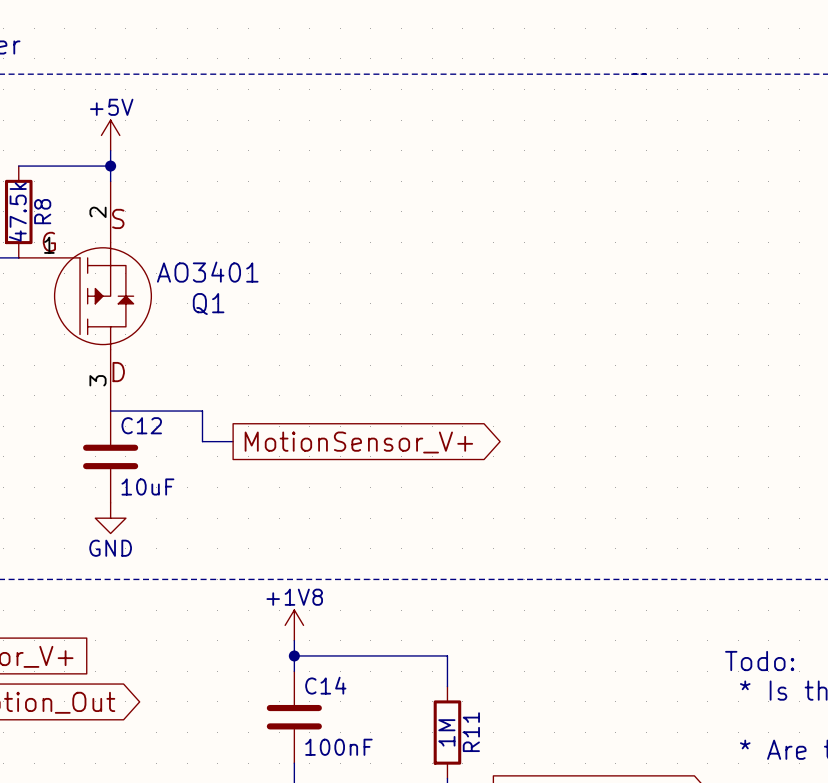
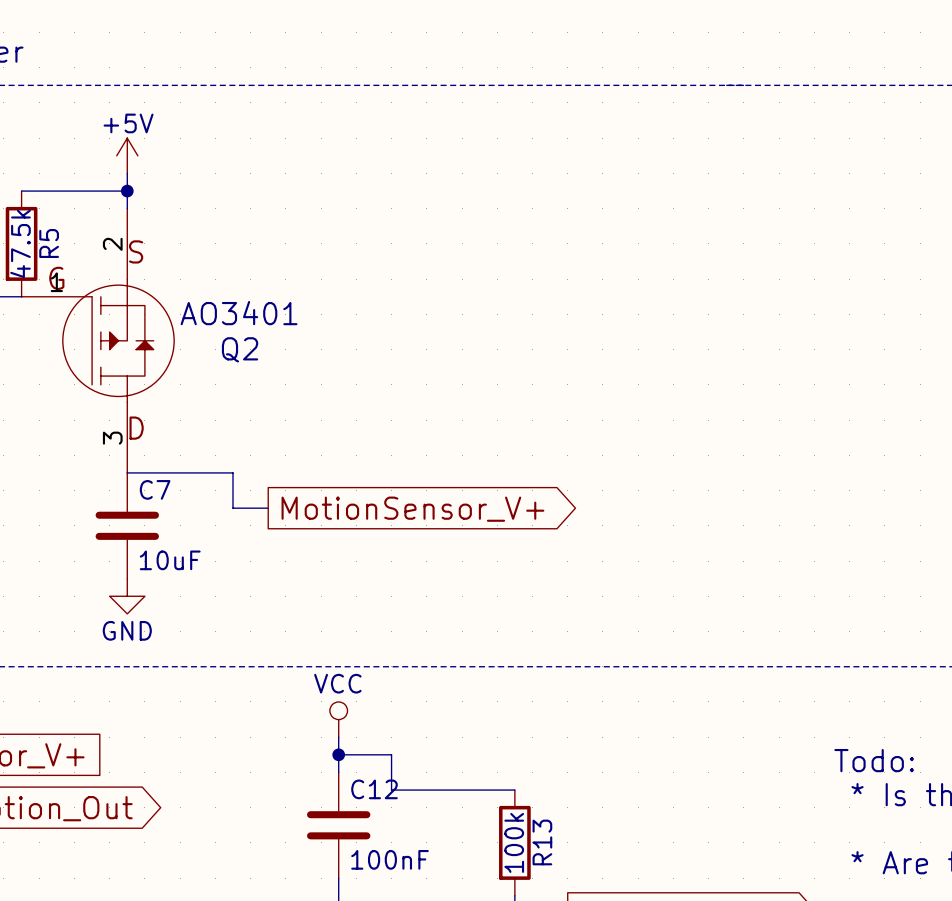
R8 name: R8 (42, 211) -> R5 (49, 243)
Q1 name: Q1 (208, 304) -> Q2 (240, 349)
C12 name: C12 (141, 425) -> C7 (155, 489)
power symbol: +1V8 (294, 625) -> VCC (338, 719)
wire: (340, 655) (447, 655) (447, 686) -> (391, 754) (391, 790) (514, 790)
C14 name: C14 (325, 685) -> C12 (374, 789)
R11 value: 1M (446, 732) -> 100k (514, 842)
R11 name: R11 (471, 732) -> R13 (542, 842)

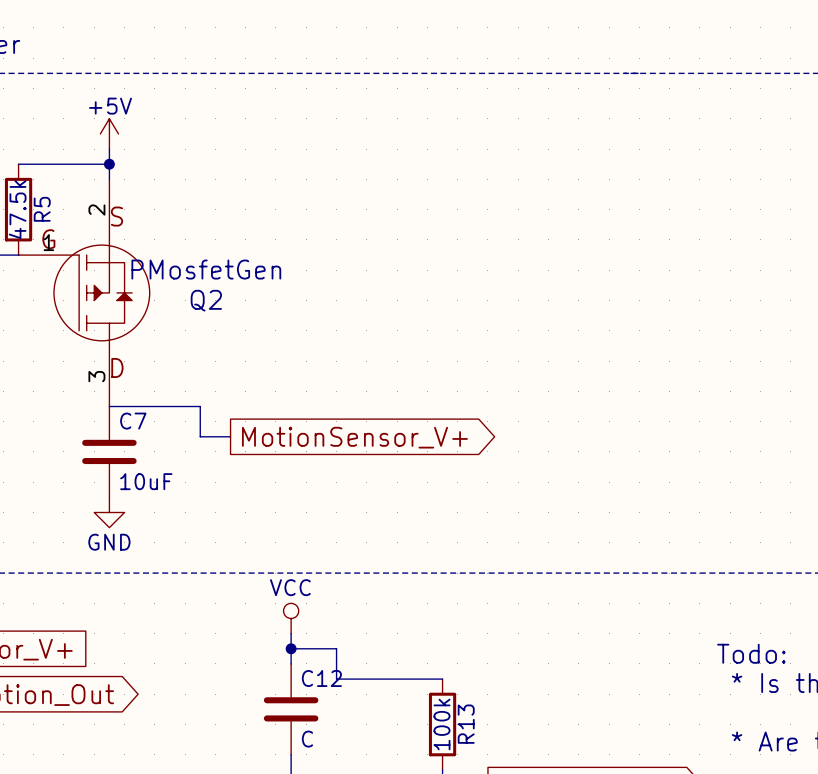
Q2 value: AO3401 (239, 313) -> PMosfetGen (206, 269)
C12 value: 100nF (390, 859) -> C (307, 739)

